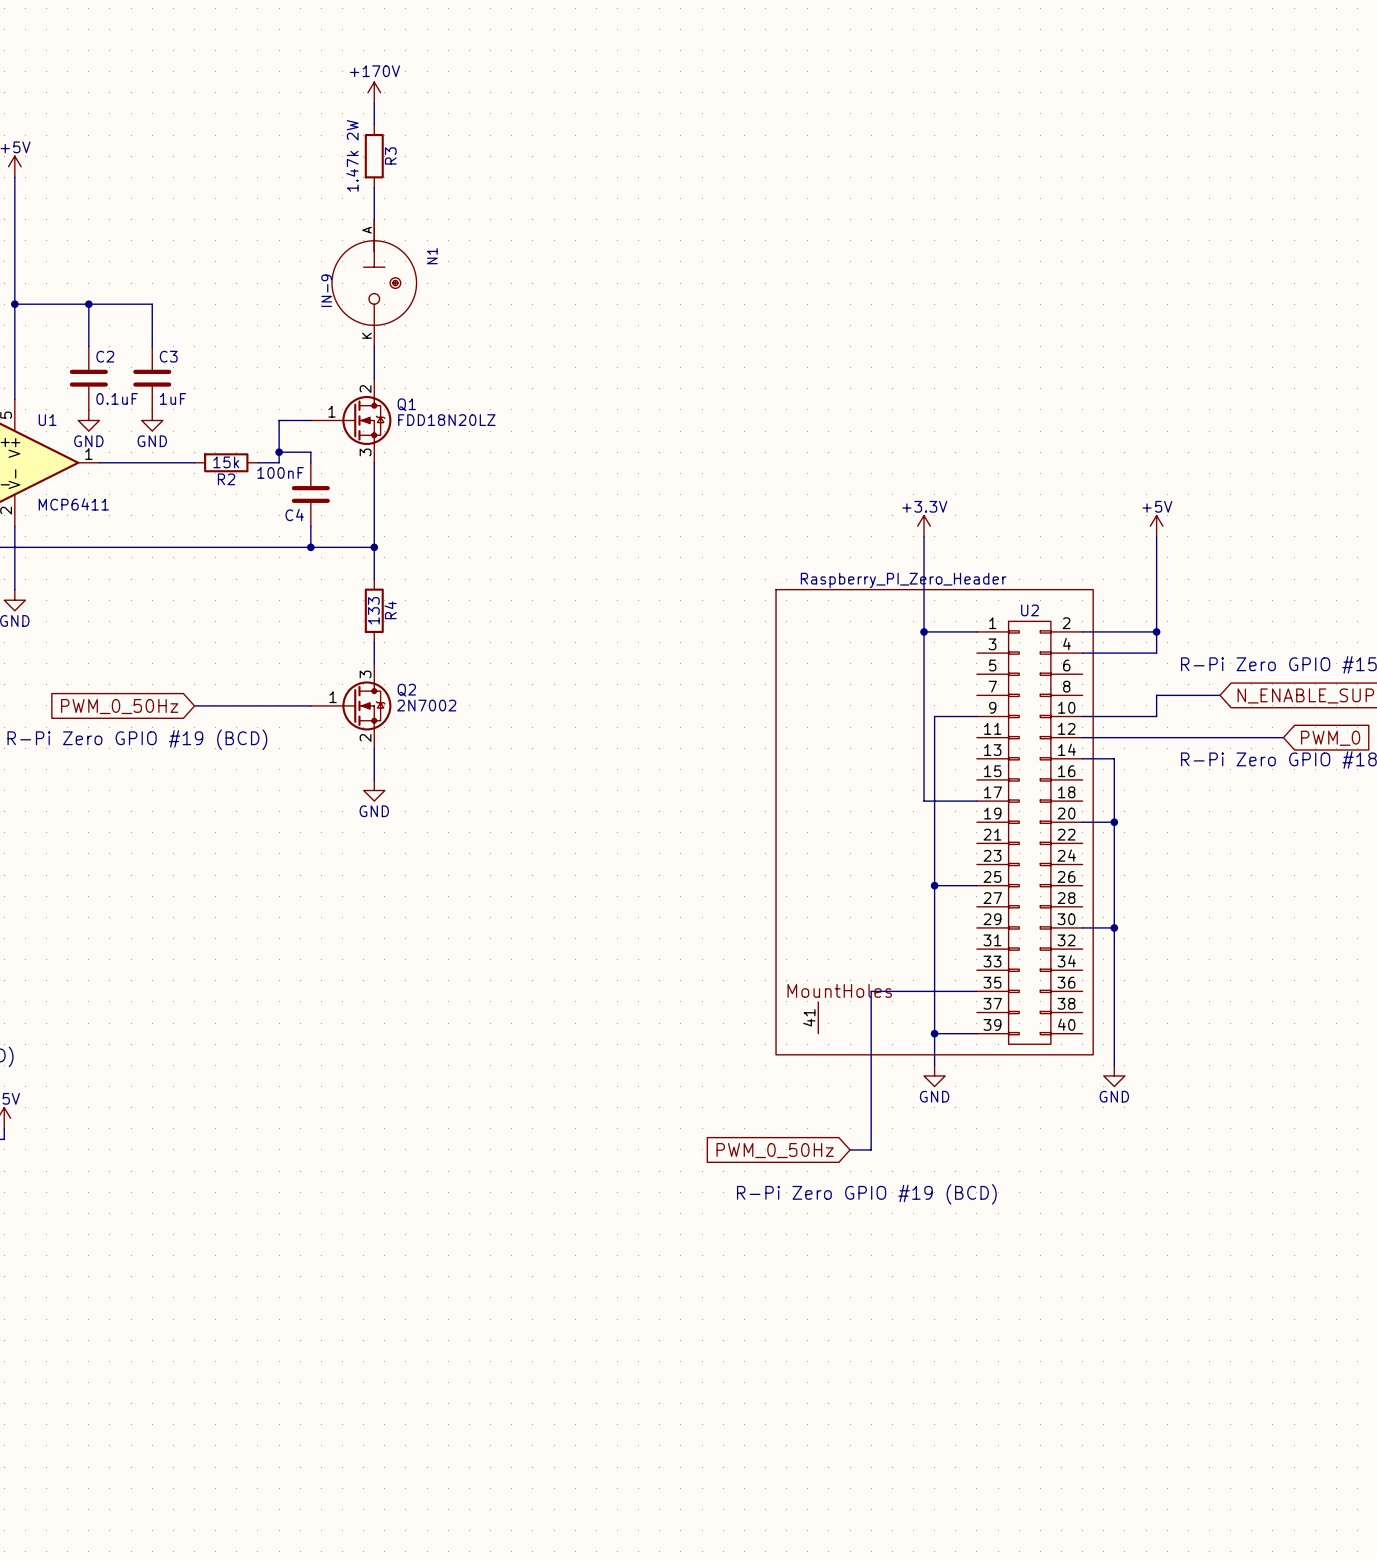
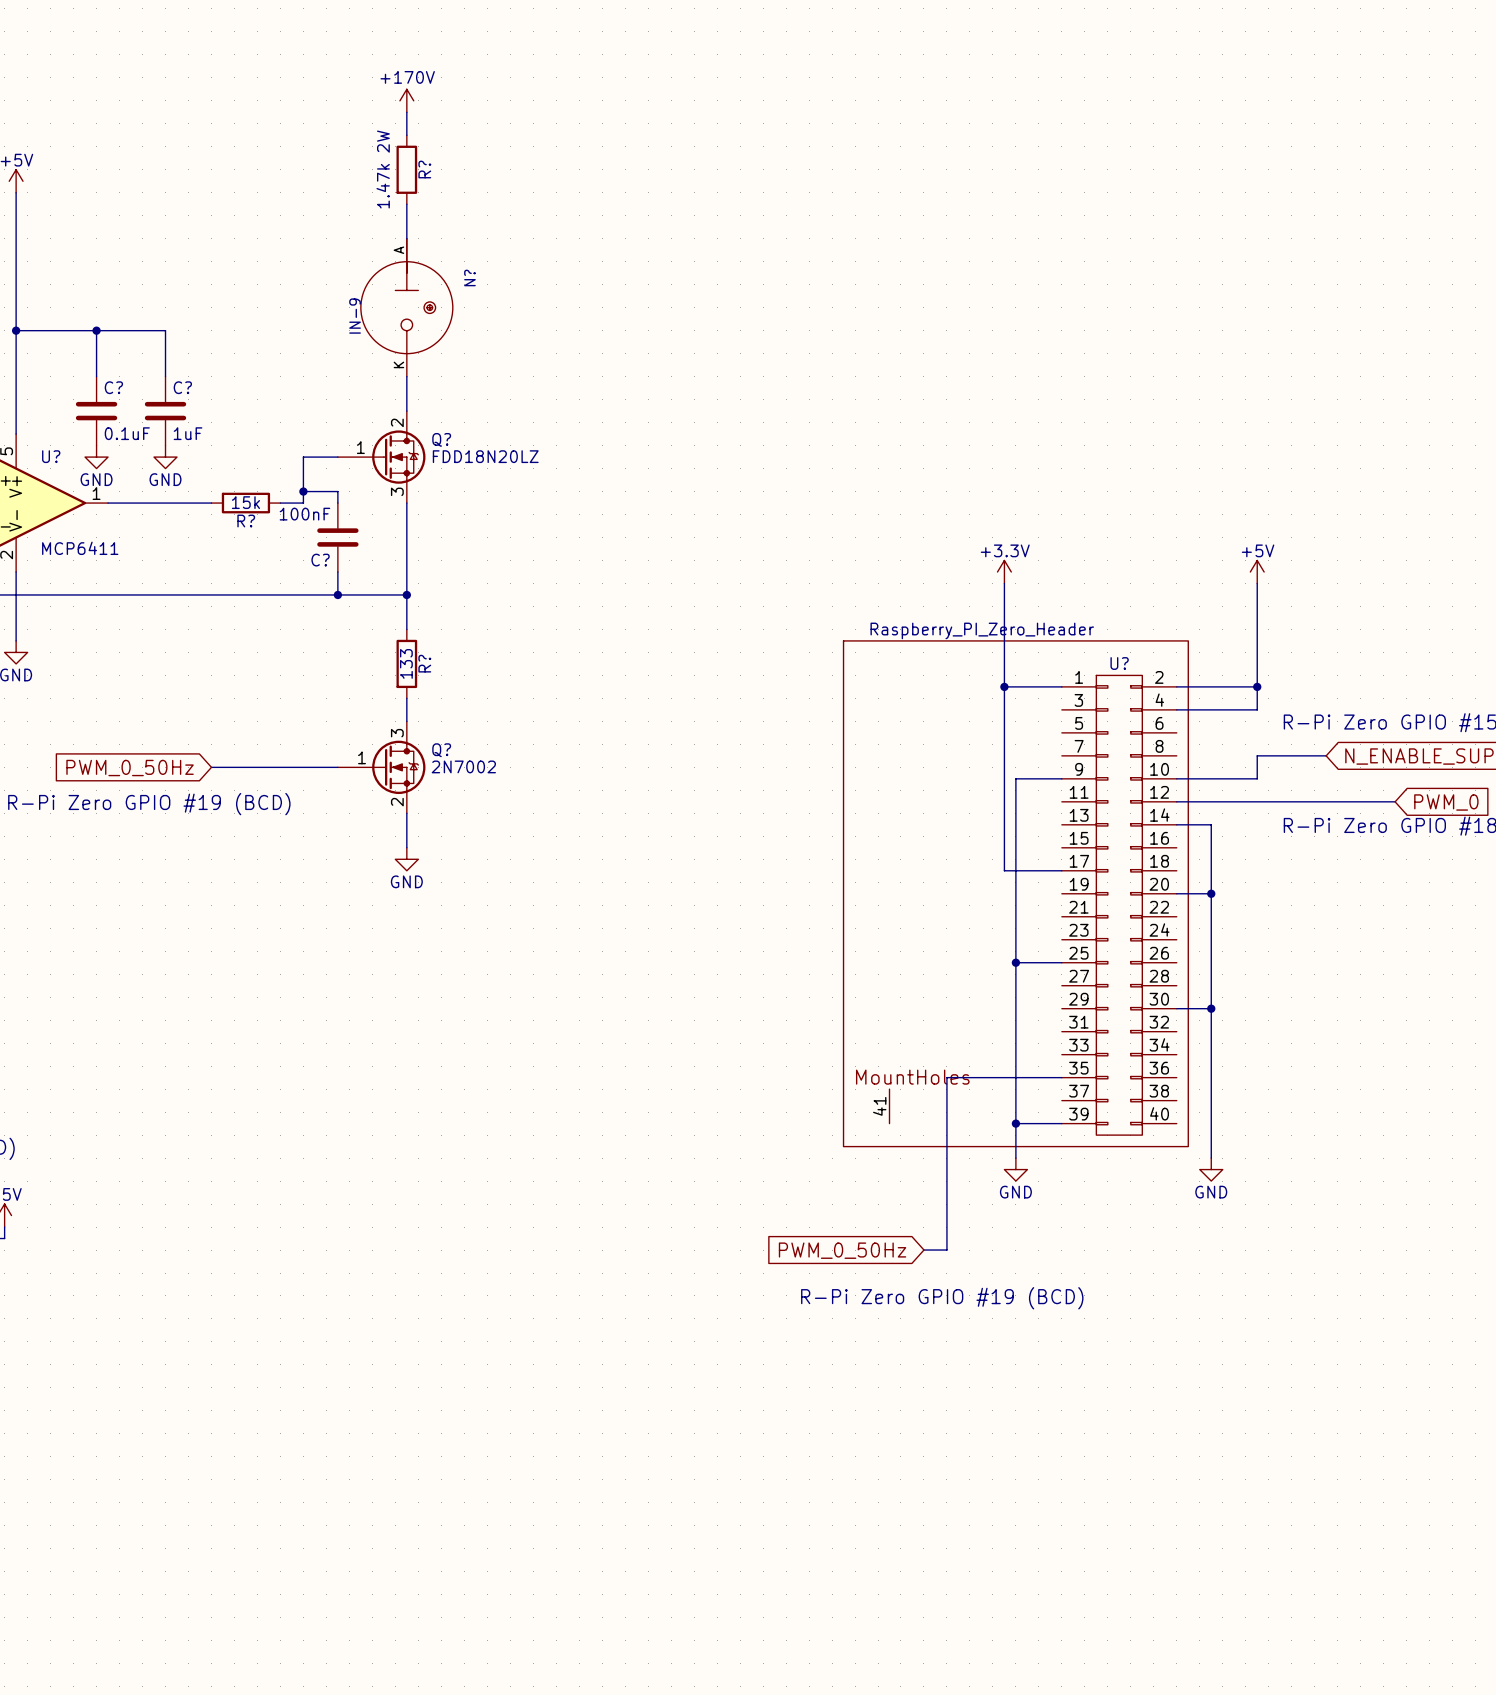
R3 name: R3 (390, 155) -> R? (424, 169)
N1 name: N1 (432, 256) -> N? (469, 277)
C2 name: C2 (105, 356) -> C? (113, 387)
C3 name: C3 (168, 356) -> C? (182, 387)
Q1 name: Q1 (406, 404) -> Q? (441, 439)
U1 name: U1 (47, 420) -> U? (51, 456)
R2 name: R2 (226, 479) -> R? (246, 521)
C4 name: C4 (294, 514) -> C? (320, 560)
R4 name: R4 (390, 610) -> R? (424, 663)
U2 name: U2 (1029, 610) -> U? (1119, 663)
Q2 name: Q2 (406, 690) -> Q? (441, 750)

